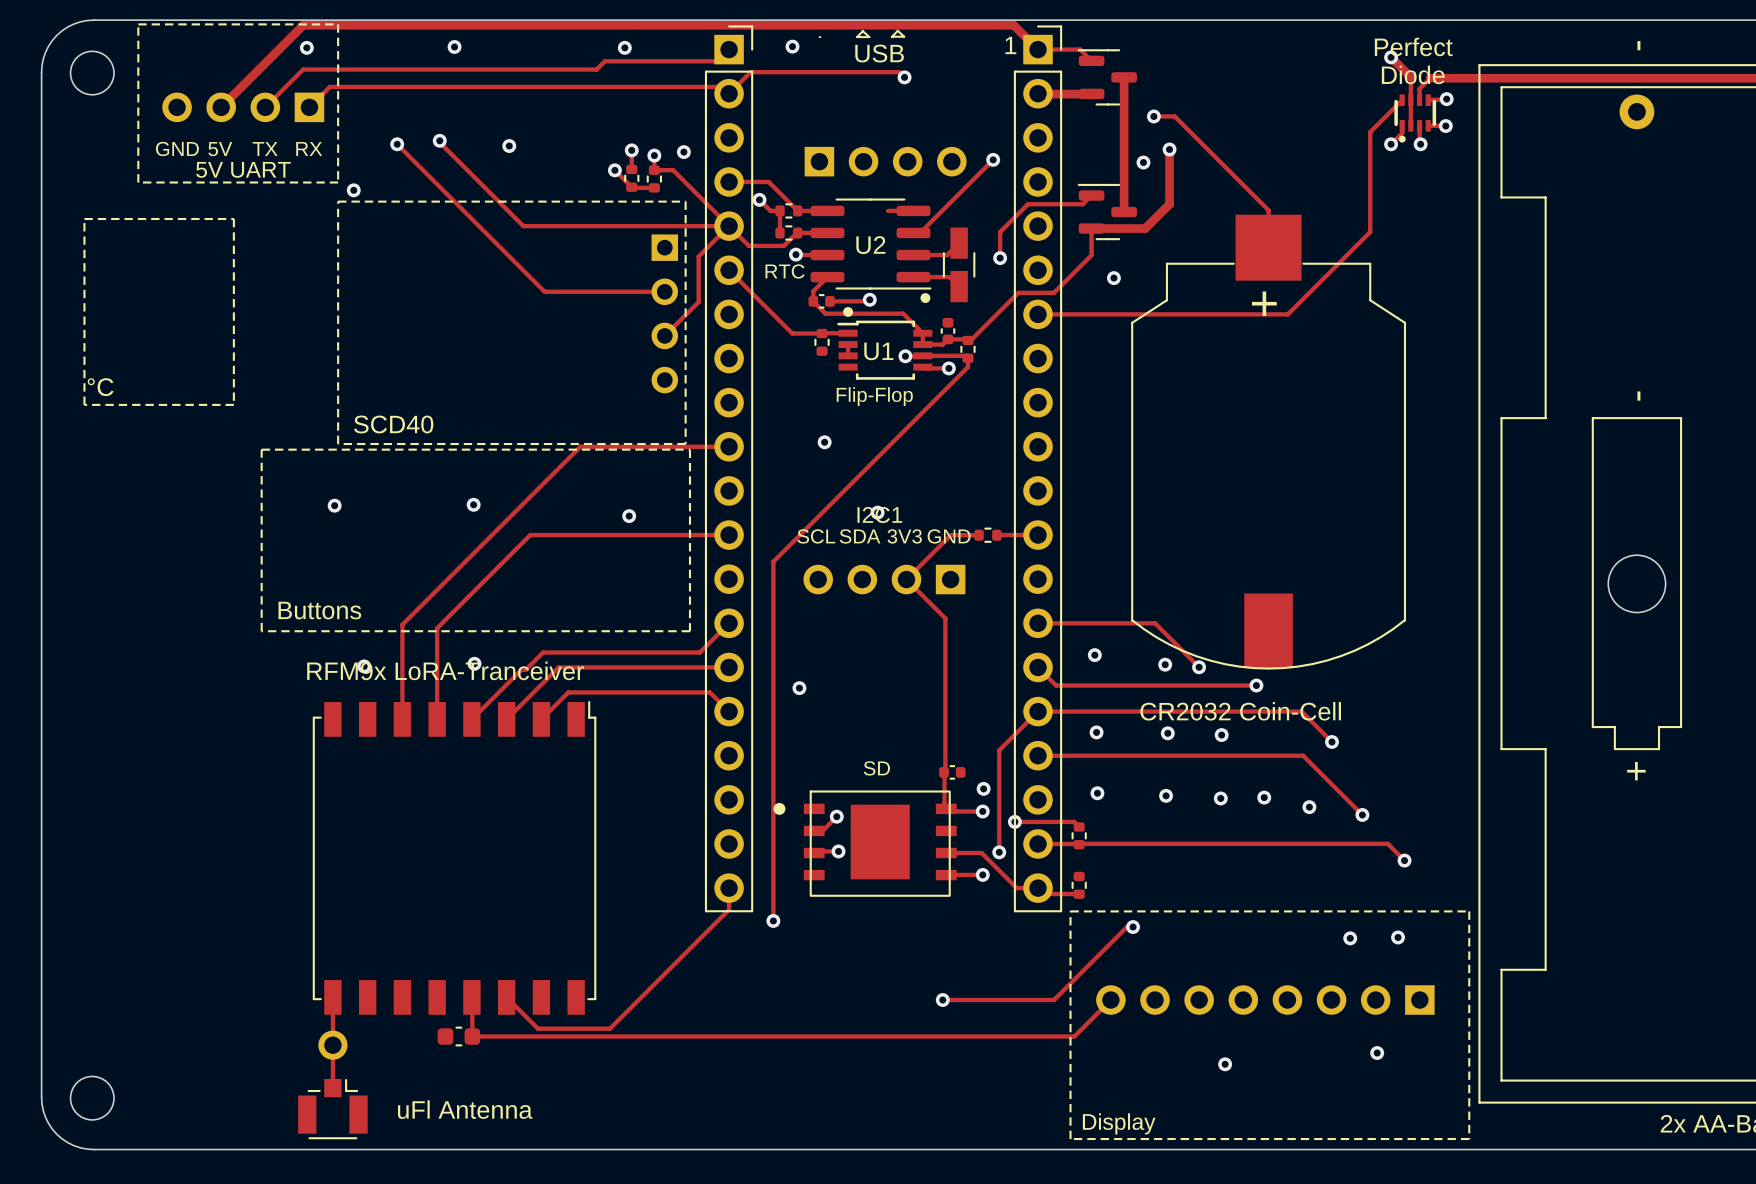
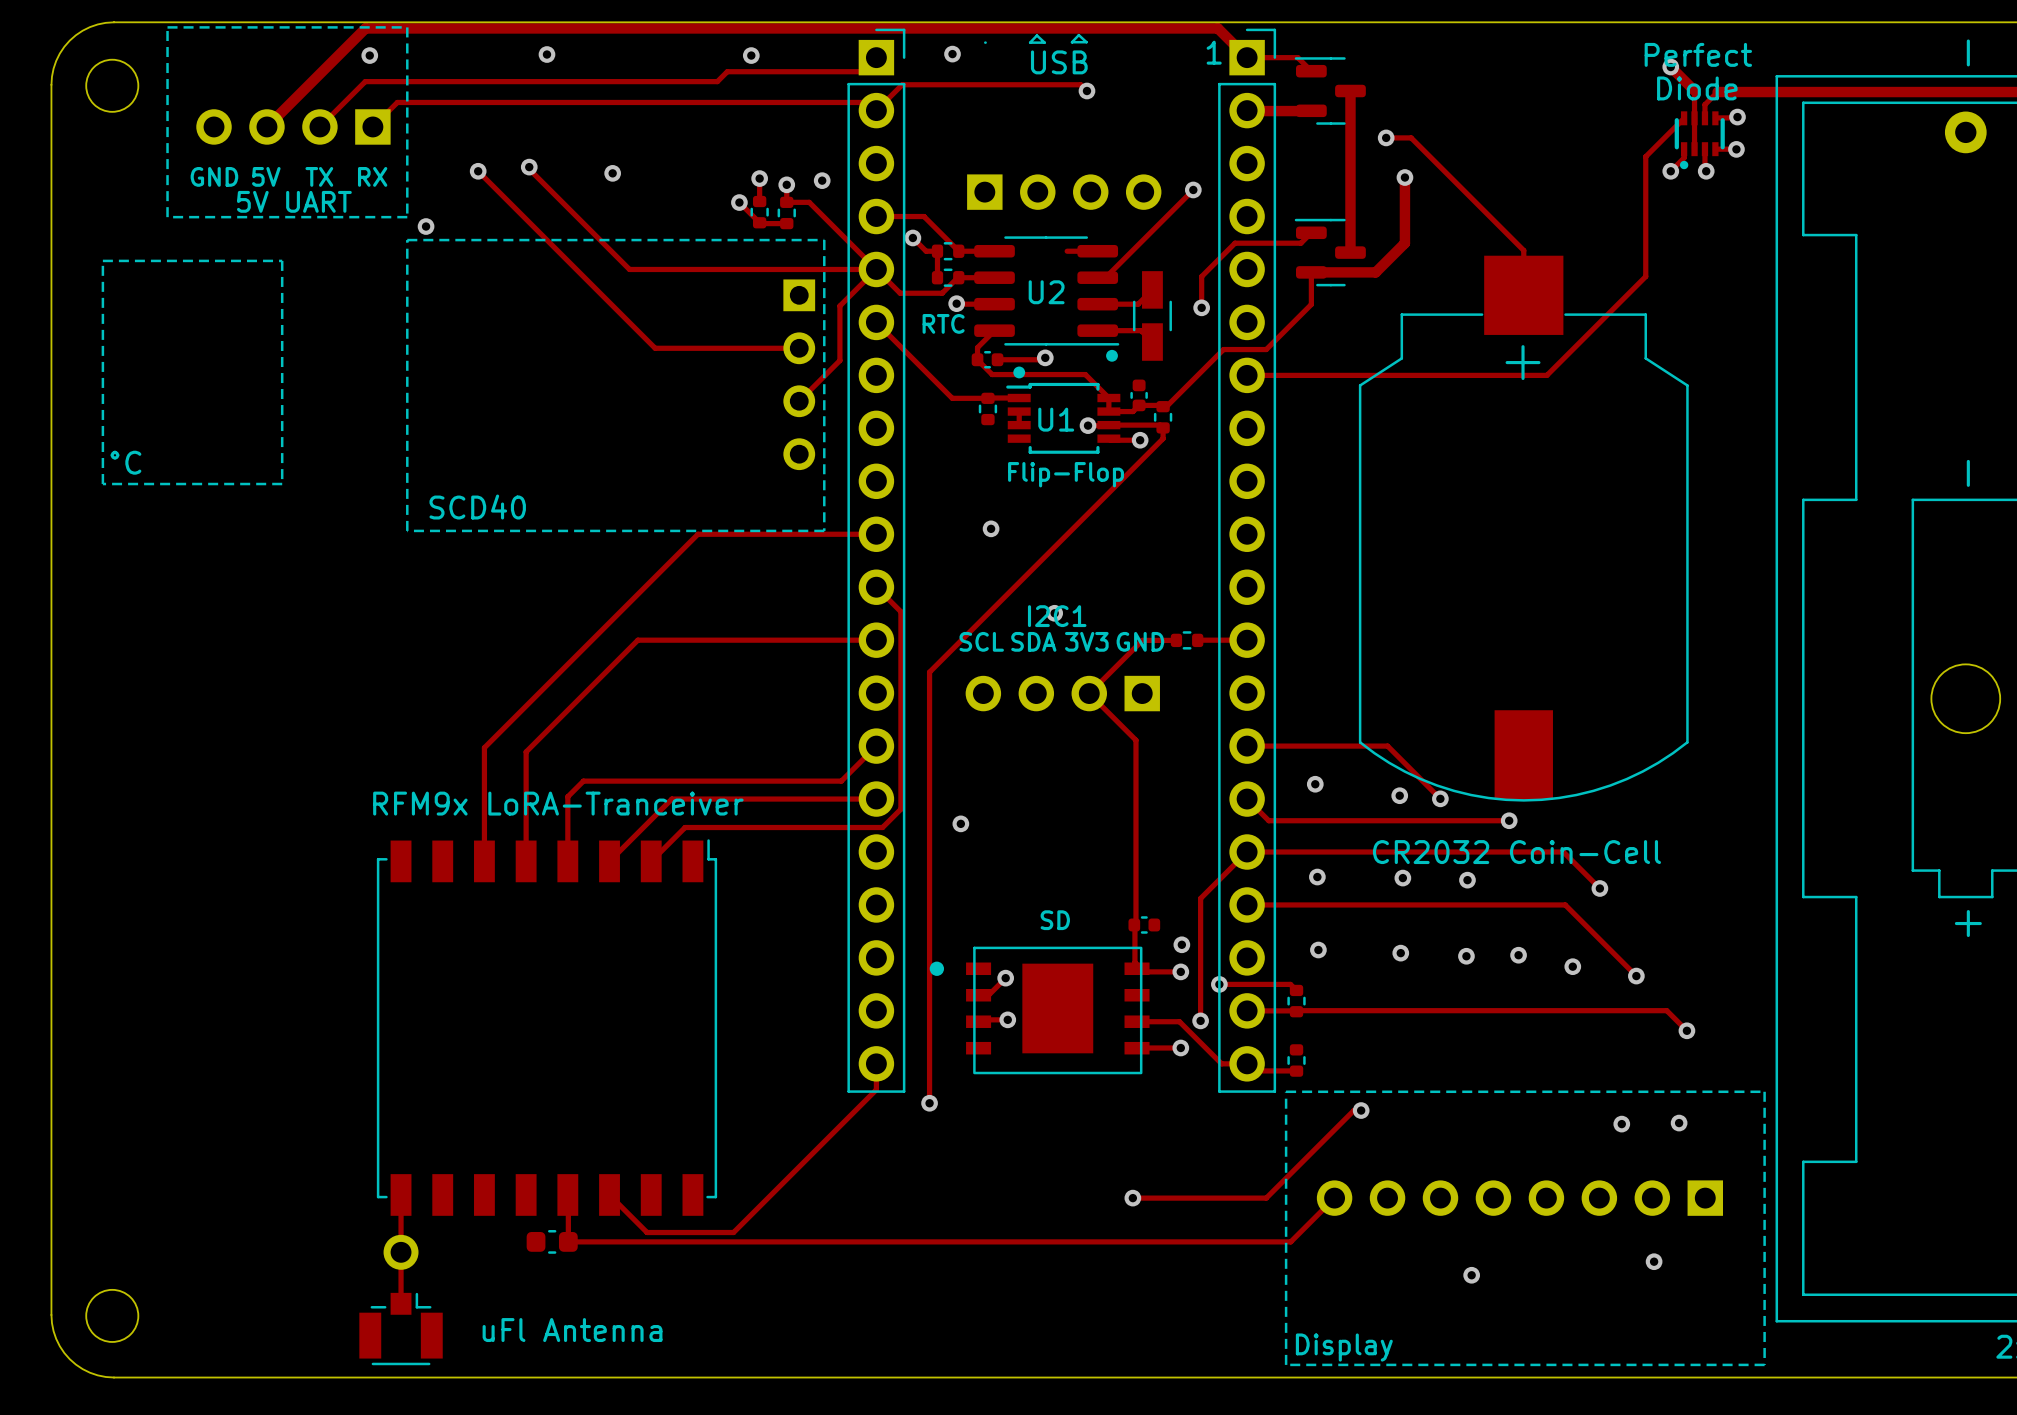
via: (1143, 162) -> none
via: (1113, 278) -> none
line: (261, 449) (689, 449) (689, 631) (261, 631) (261, 449) -> none
via: (473, 504) -> none
via: (334, 505) -> none
via: (629, 516) -> none
text: Buttons (319, 610) -> none
track: (543, 652) (525, 669) (521, 669) (471, 719) -> (653, 781) (583, 781) (567, 796) (567, 861)
via: (474, 663) -> none
via: (364, 666) -> none
track: (568, 692) (709, 692) (729, 711) -> (683, 829) (685, 827) (882, 827) (900, 809) (900, 611) (876, 587)

